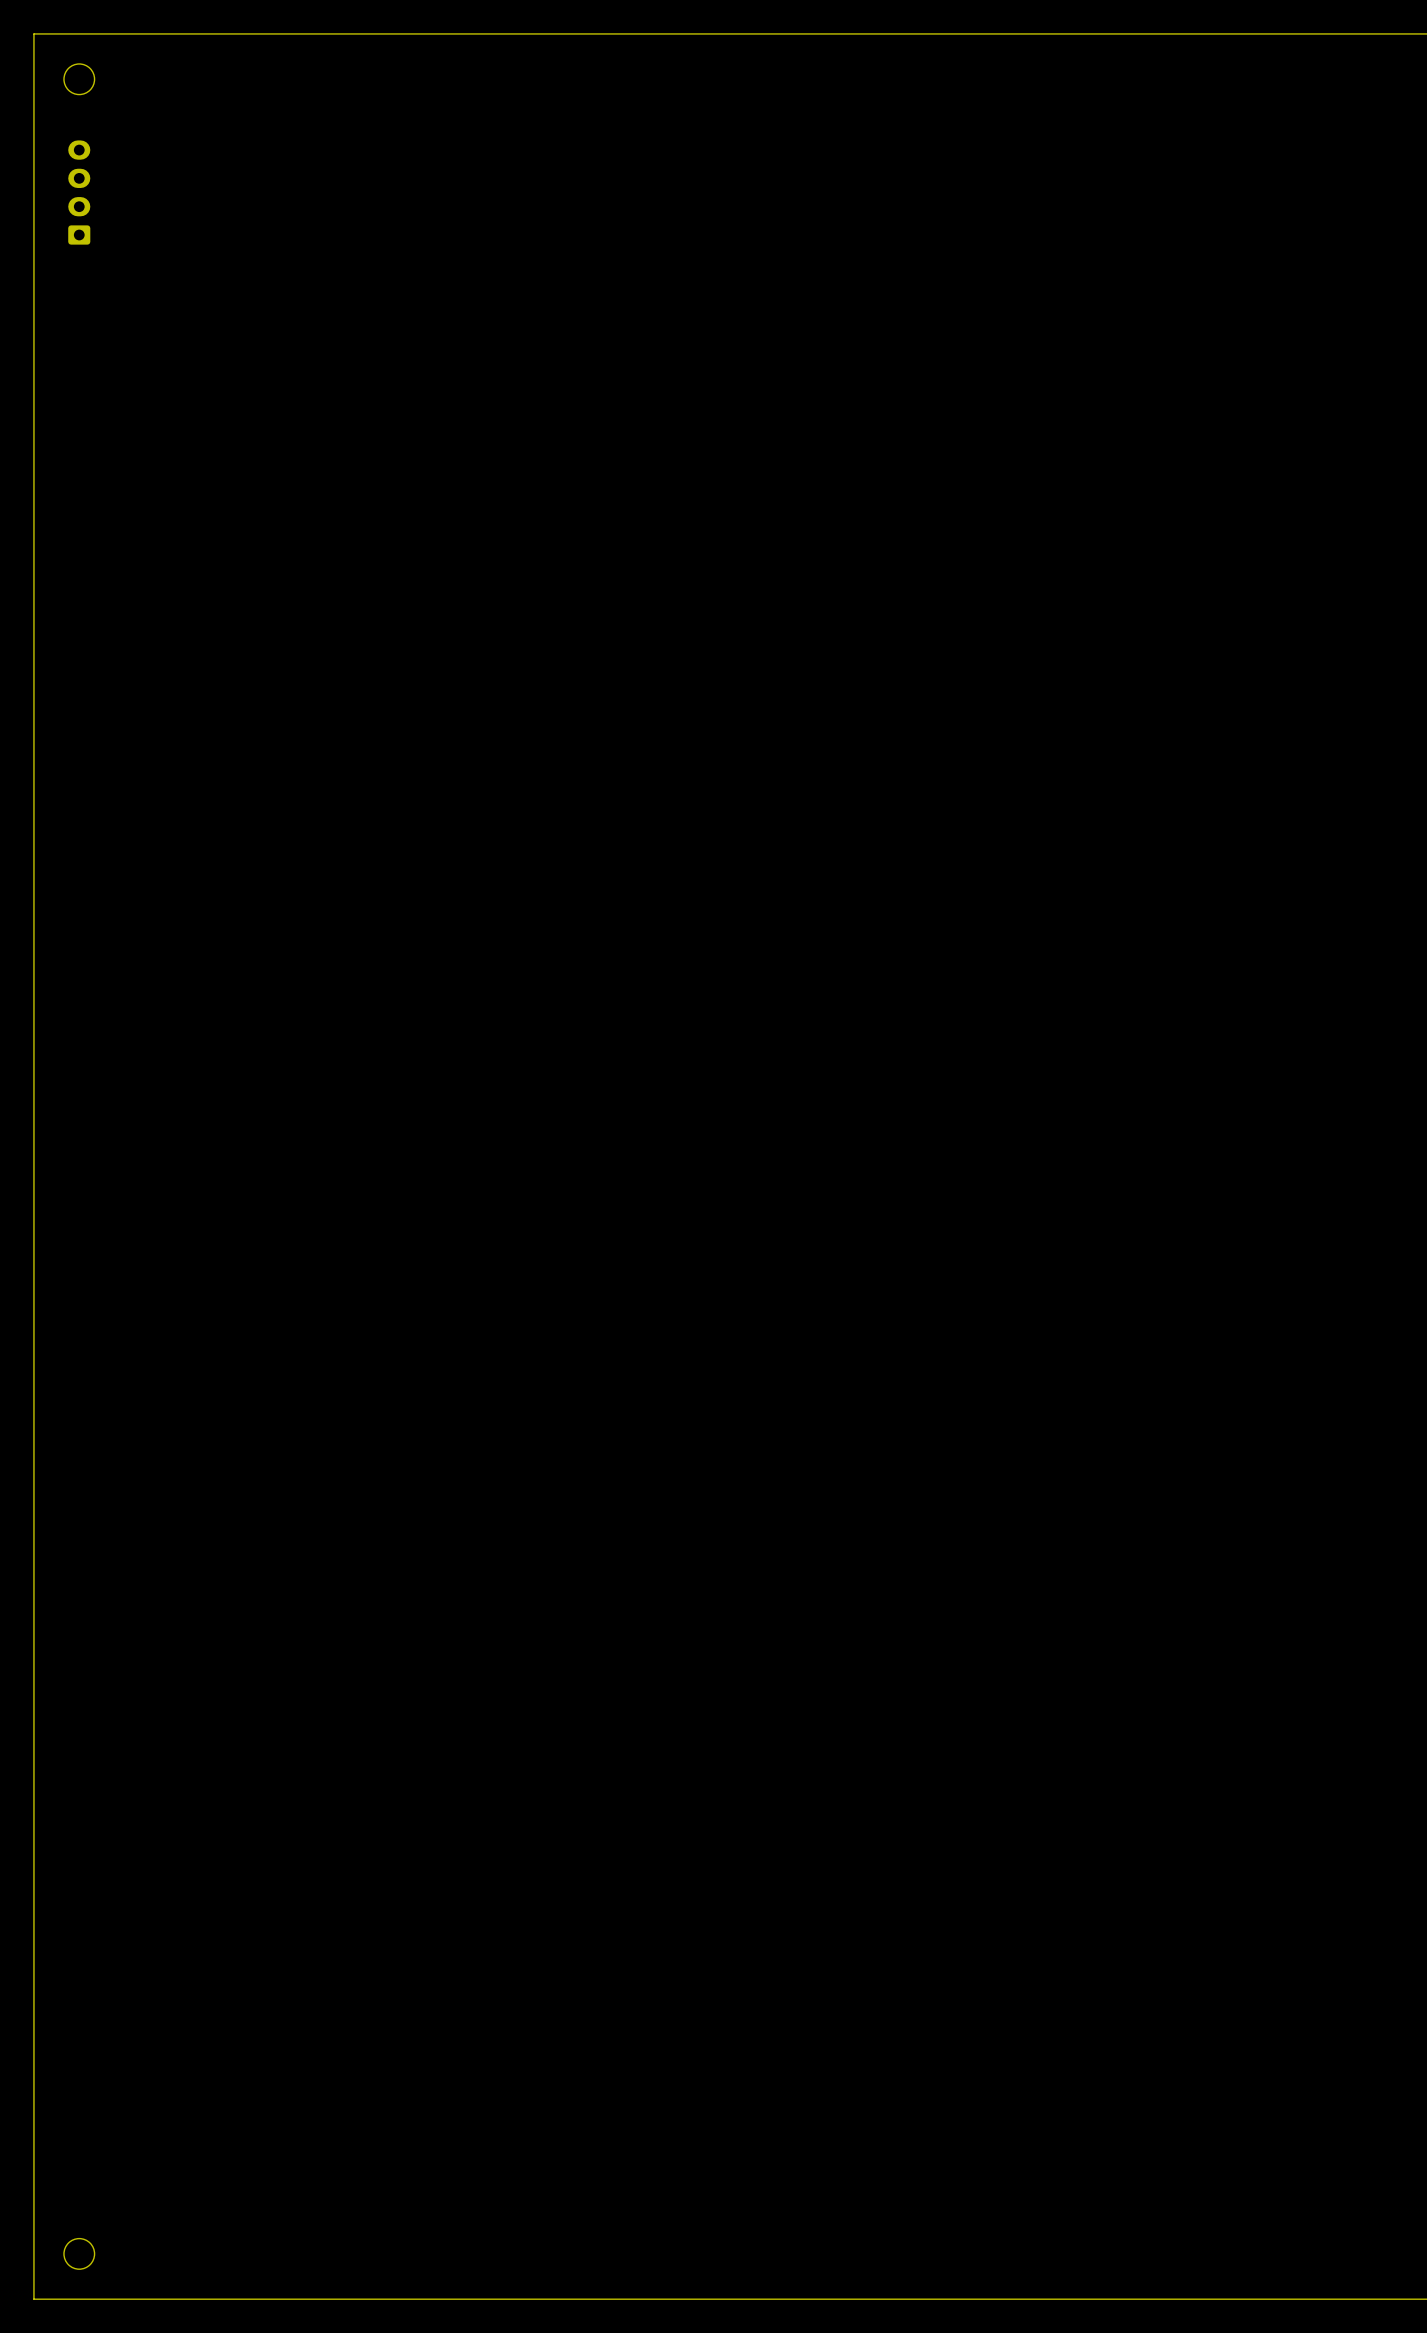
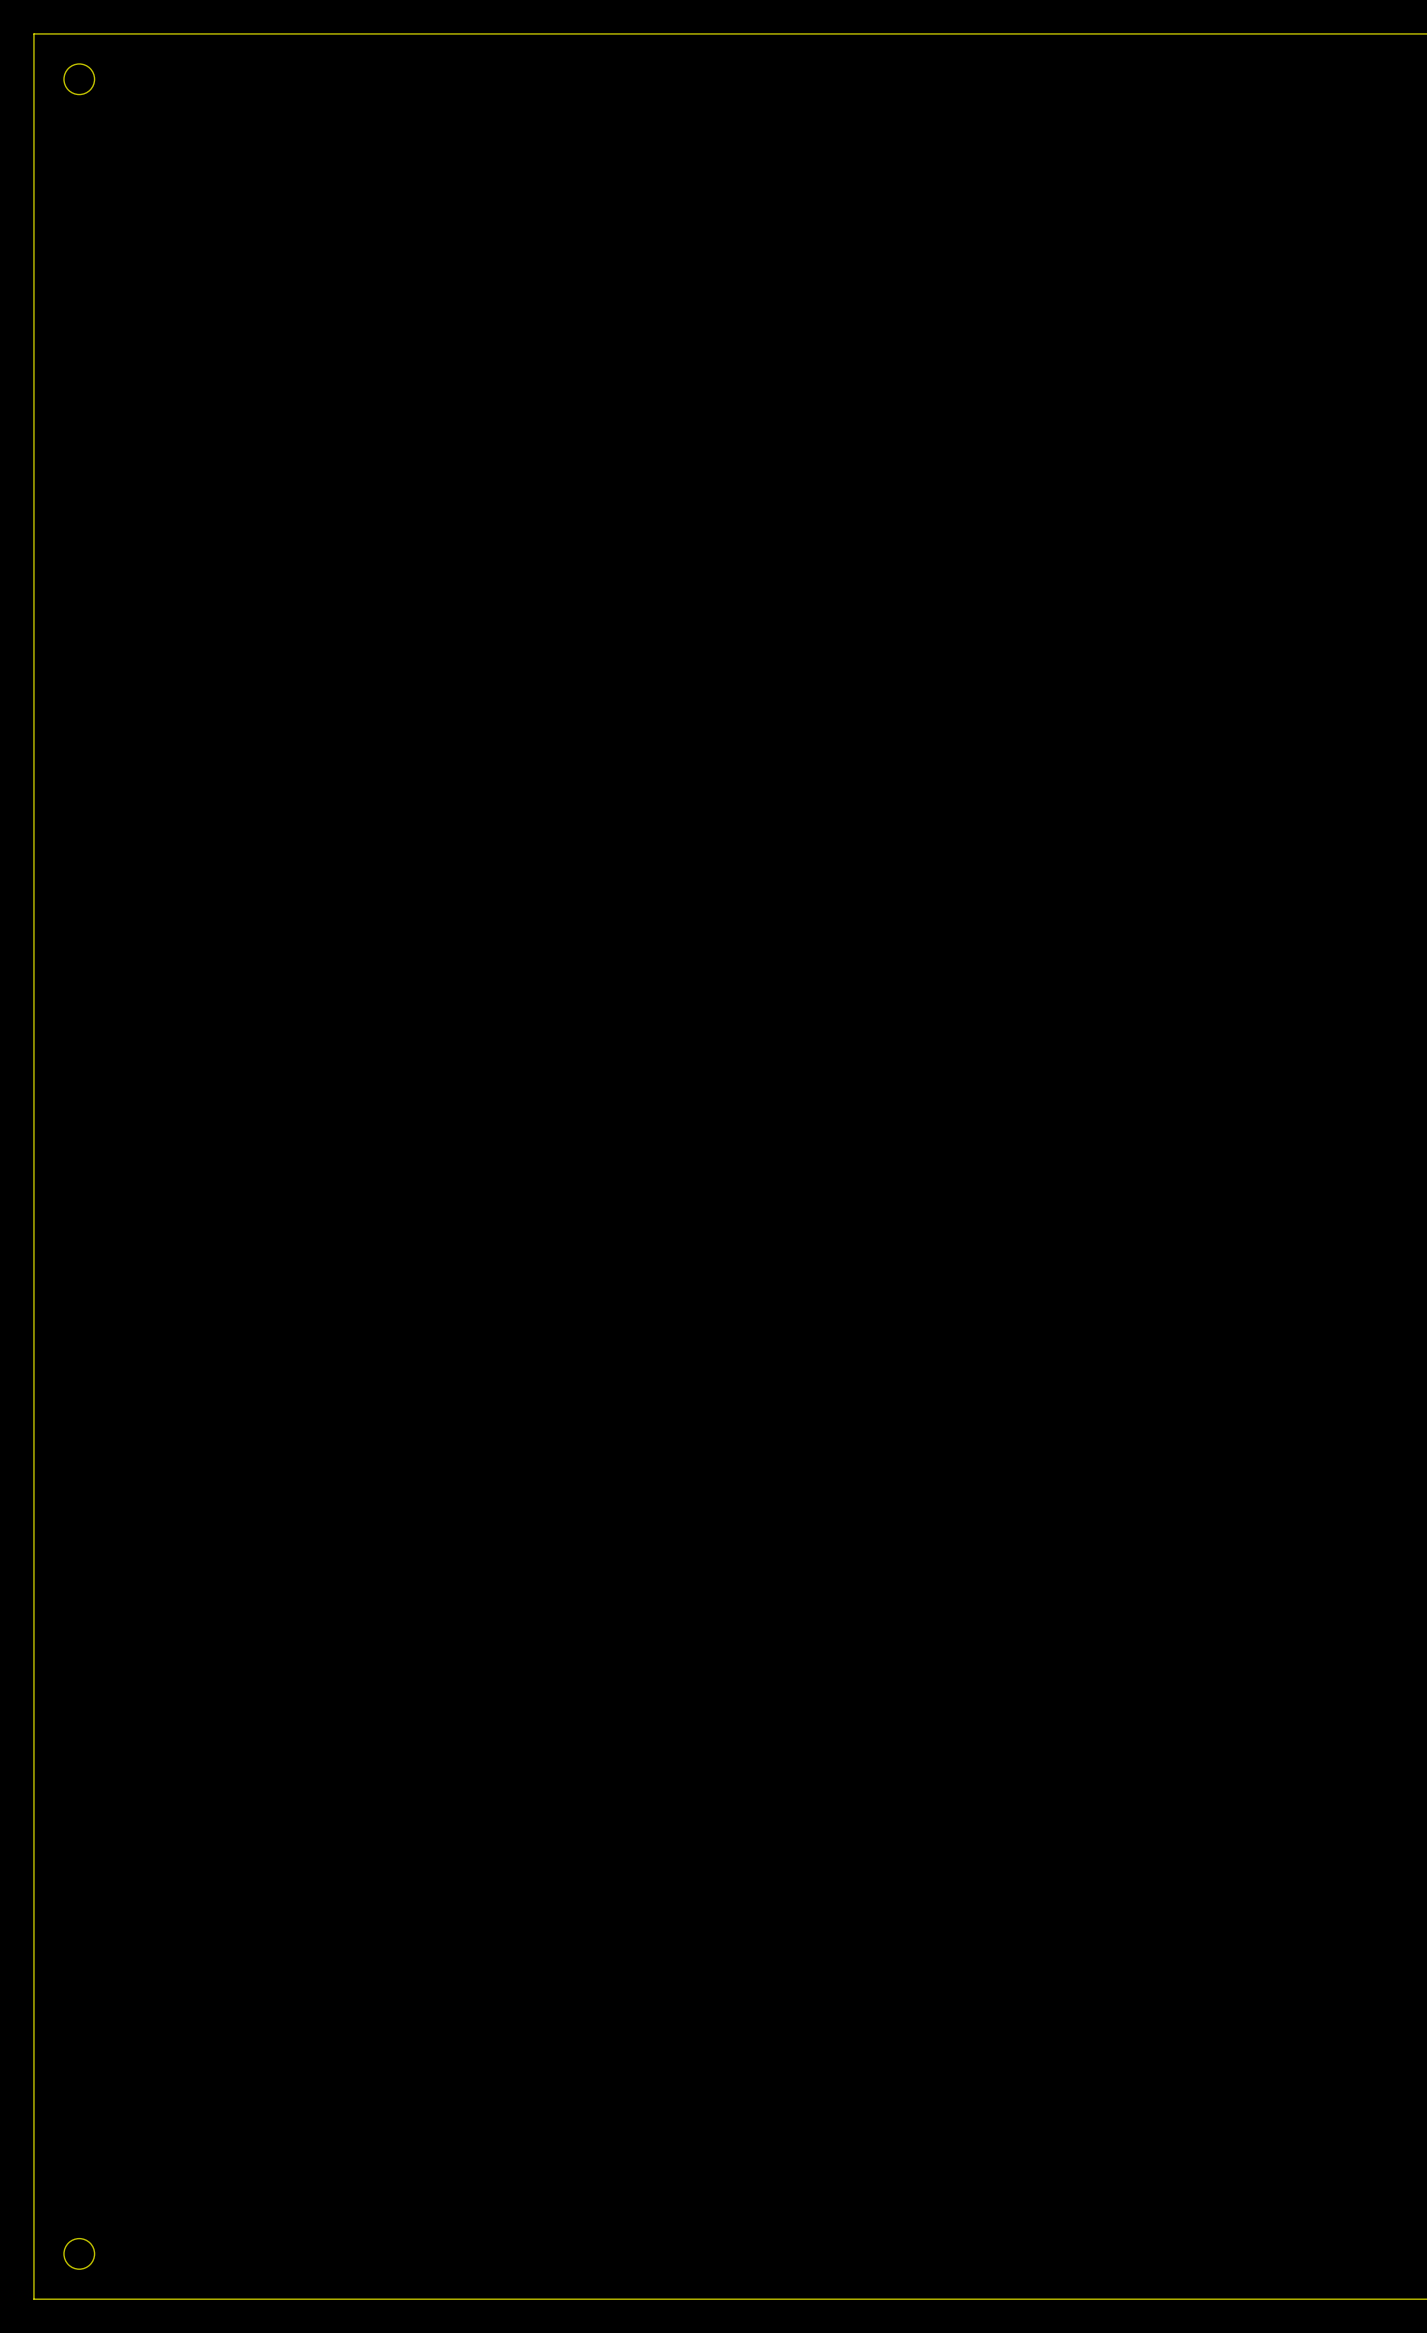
part: (79, 192) -> none

